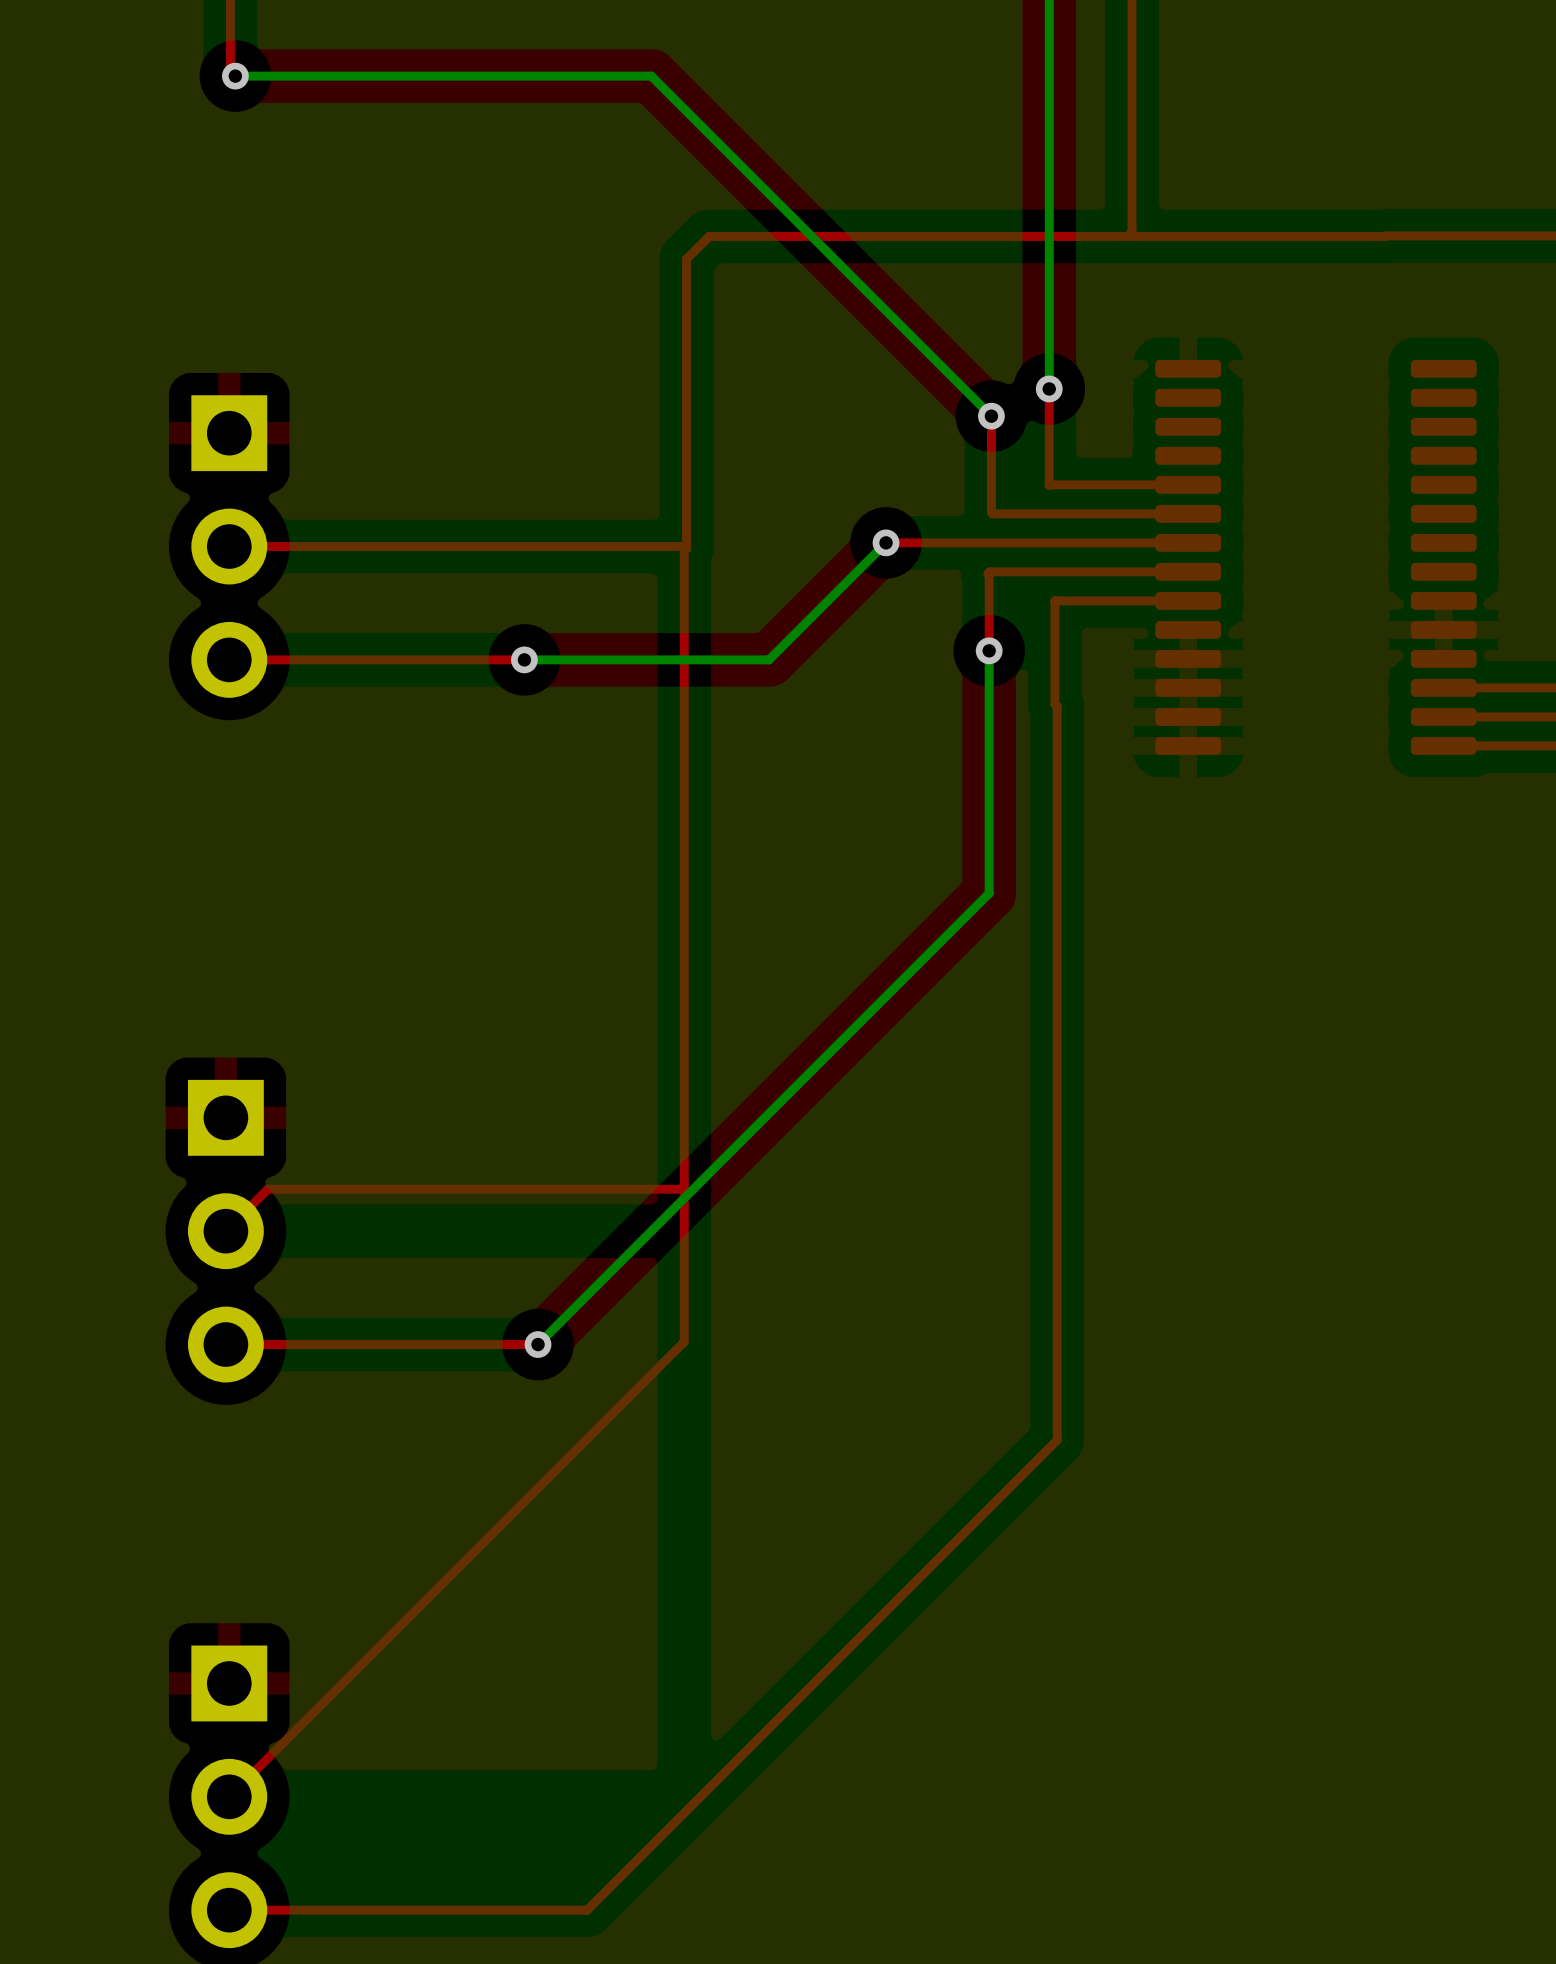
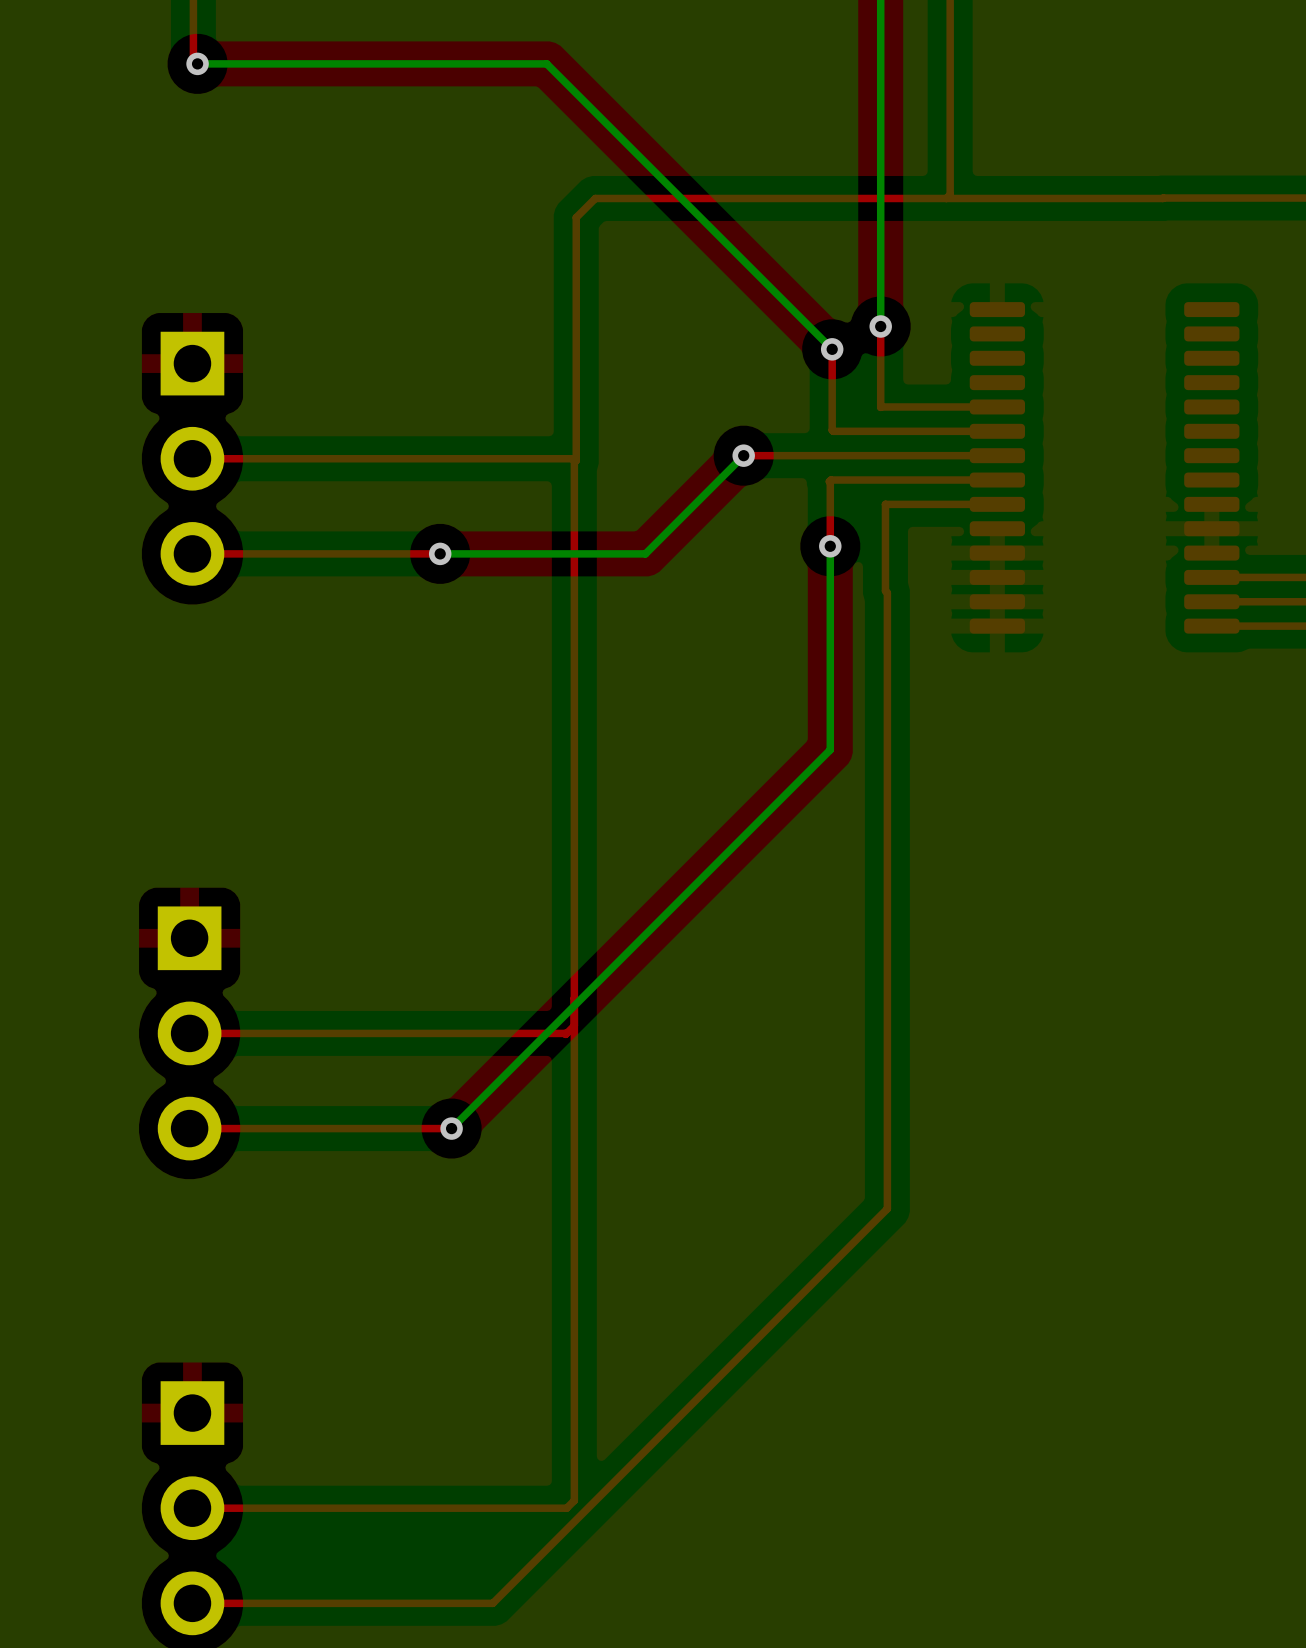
top track: (684, 1189) (267, 1189) (225, 1231) -> (574, 1025) (565, 1034) (189, 1033)
top track: (684, 1341) (229, 1796) -> (574, 1126) (574, 1500) (566, 1508) (192, 1508)

